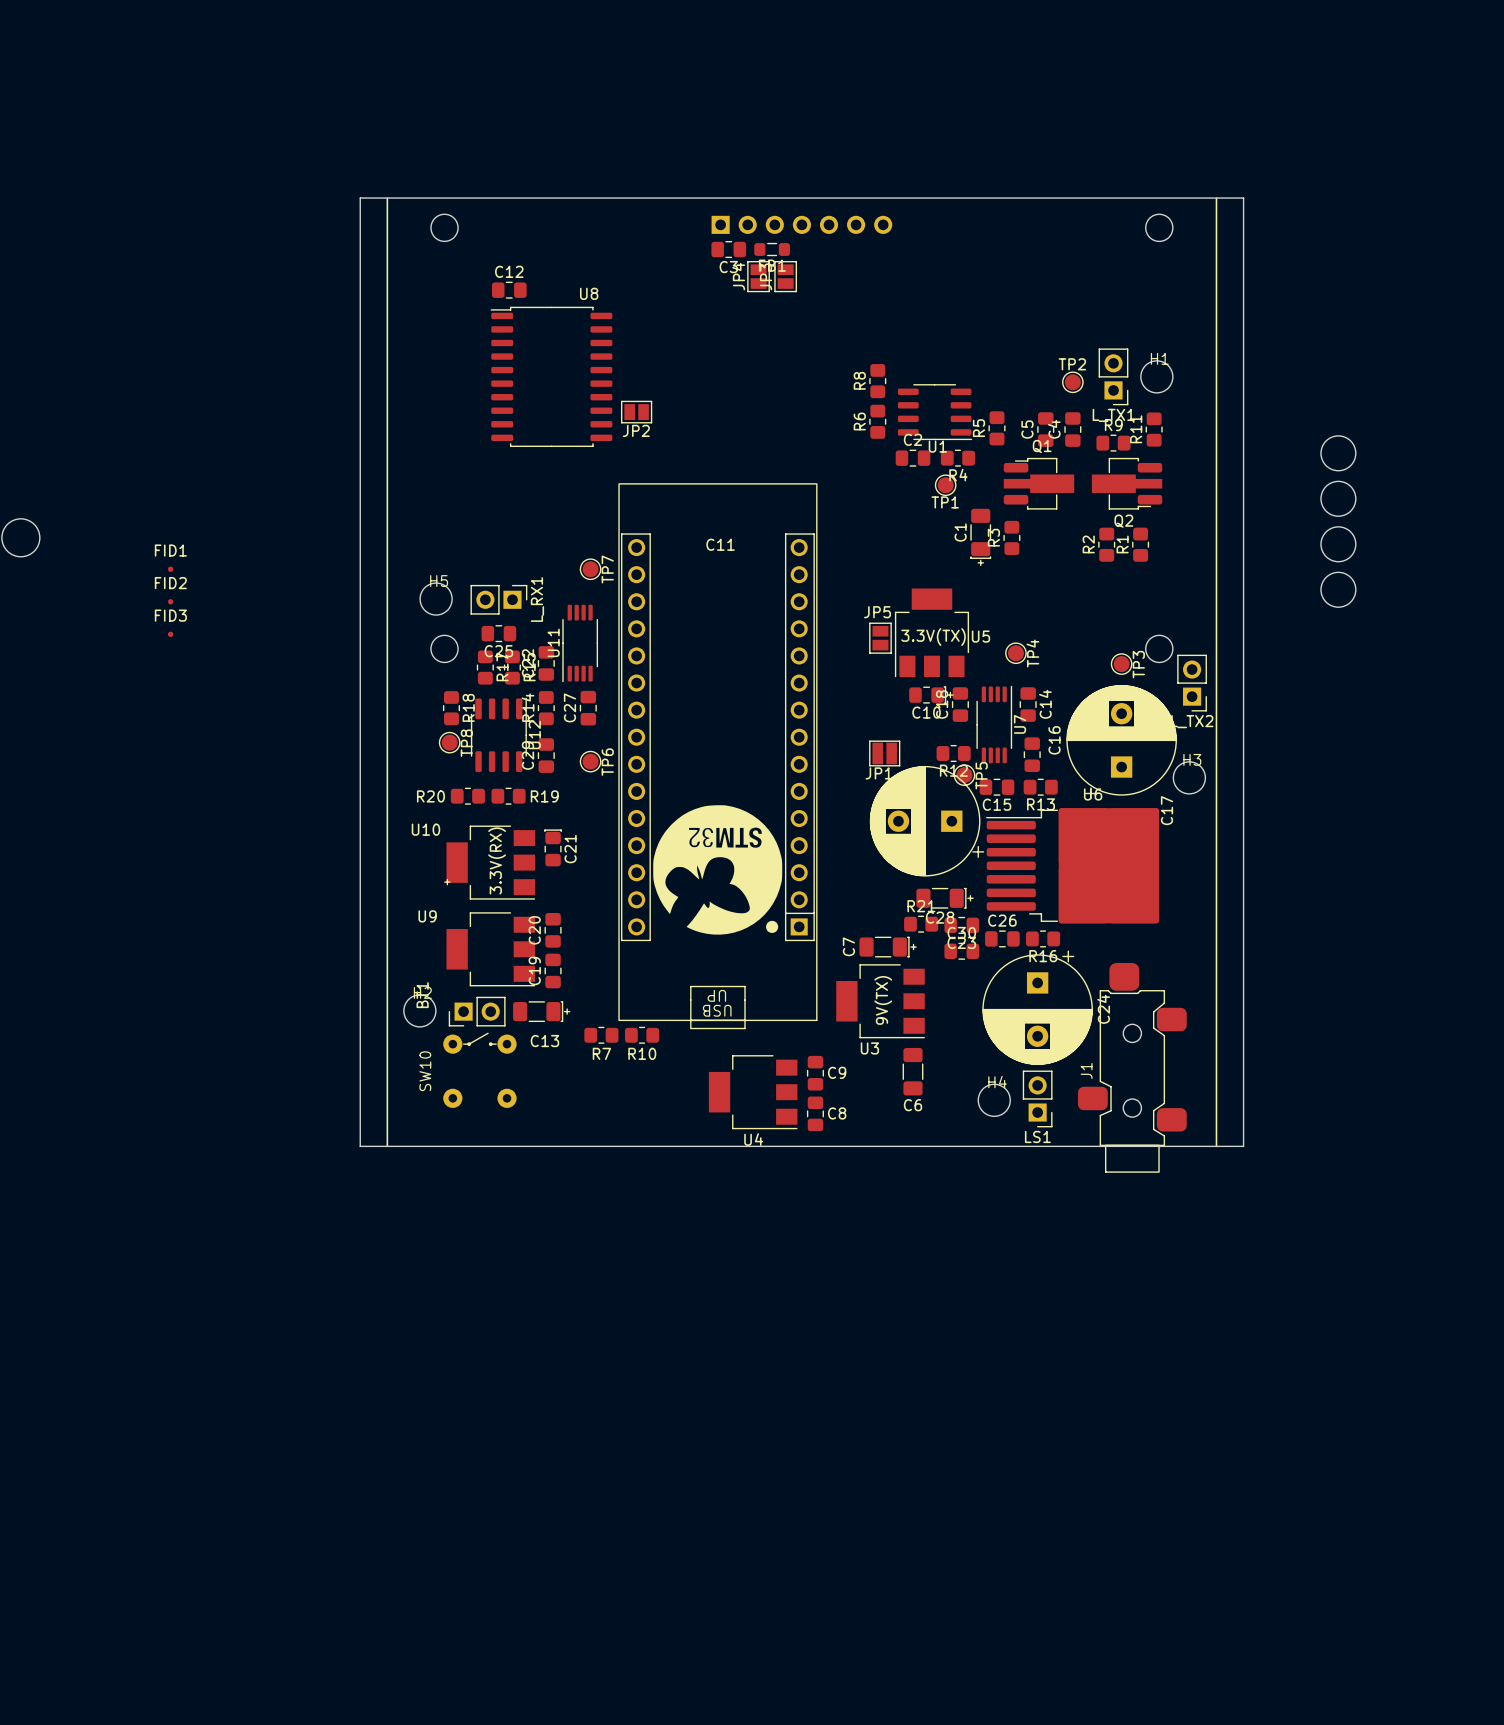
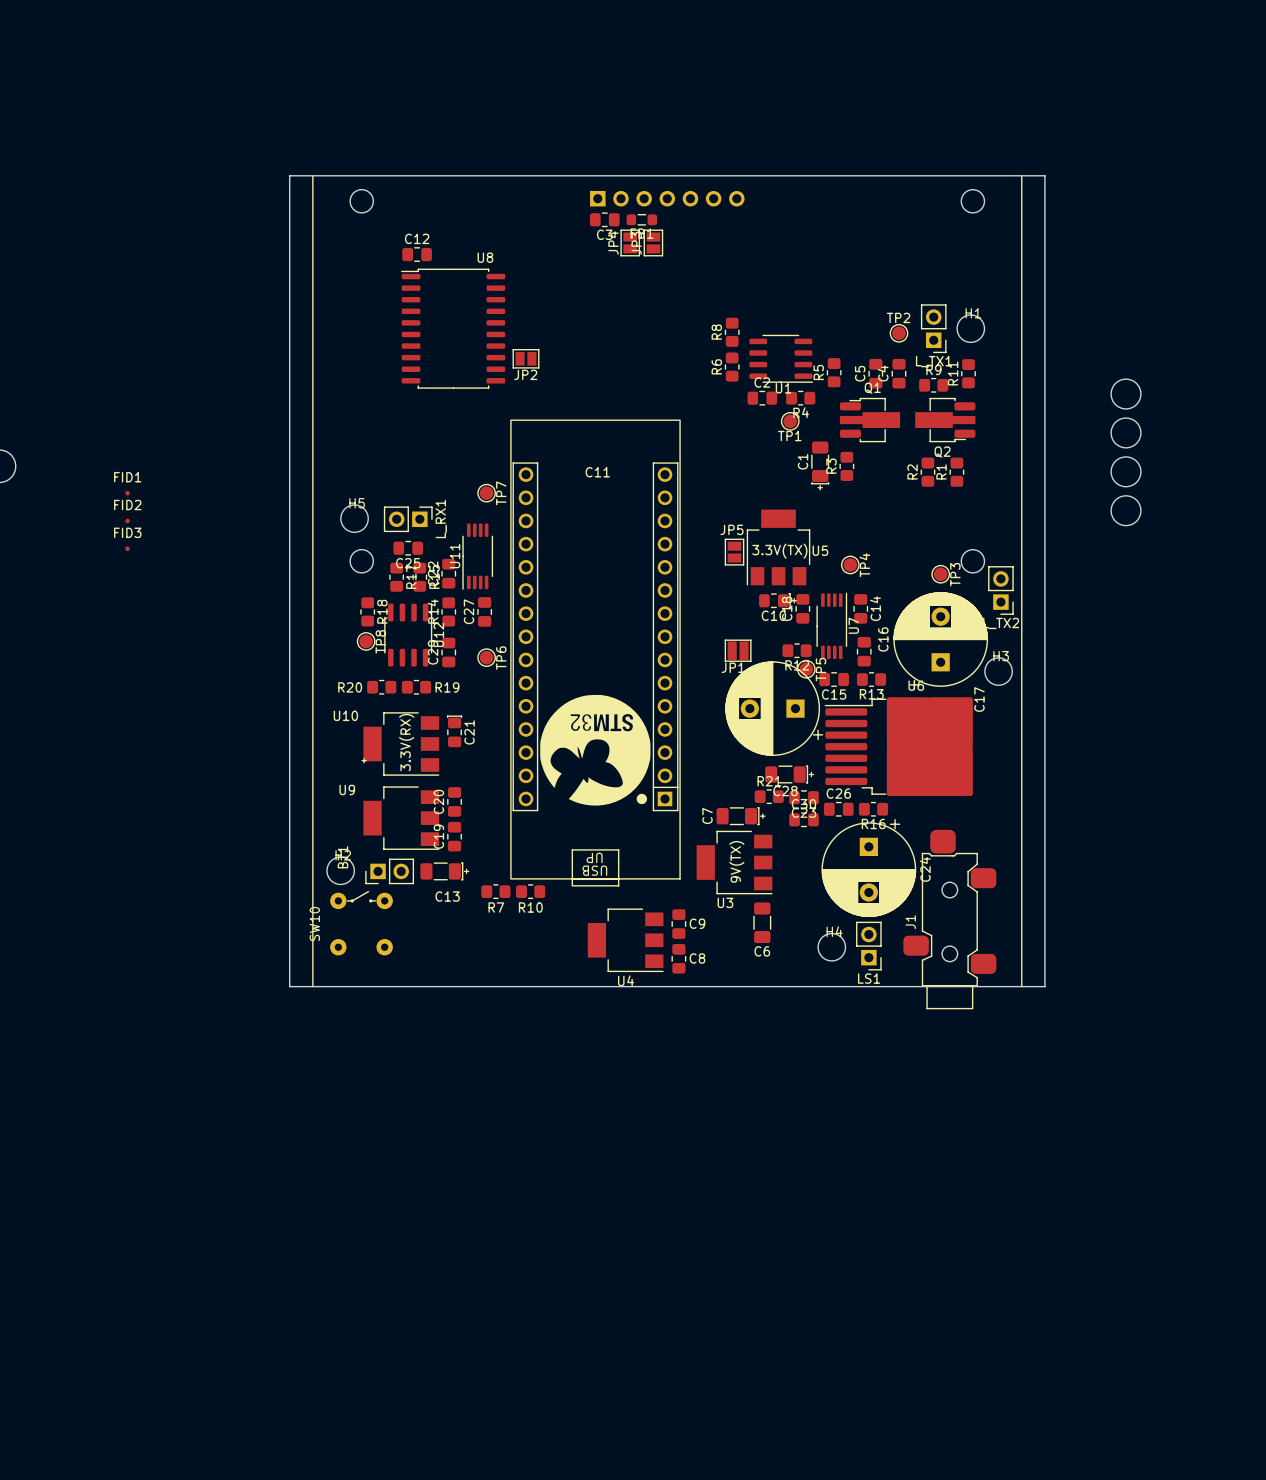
SW10 position: (479, 1070) -> (361, 923)

